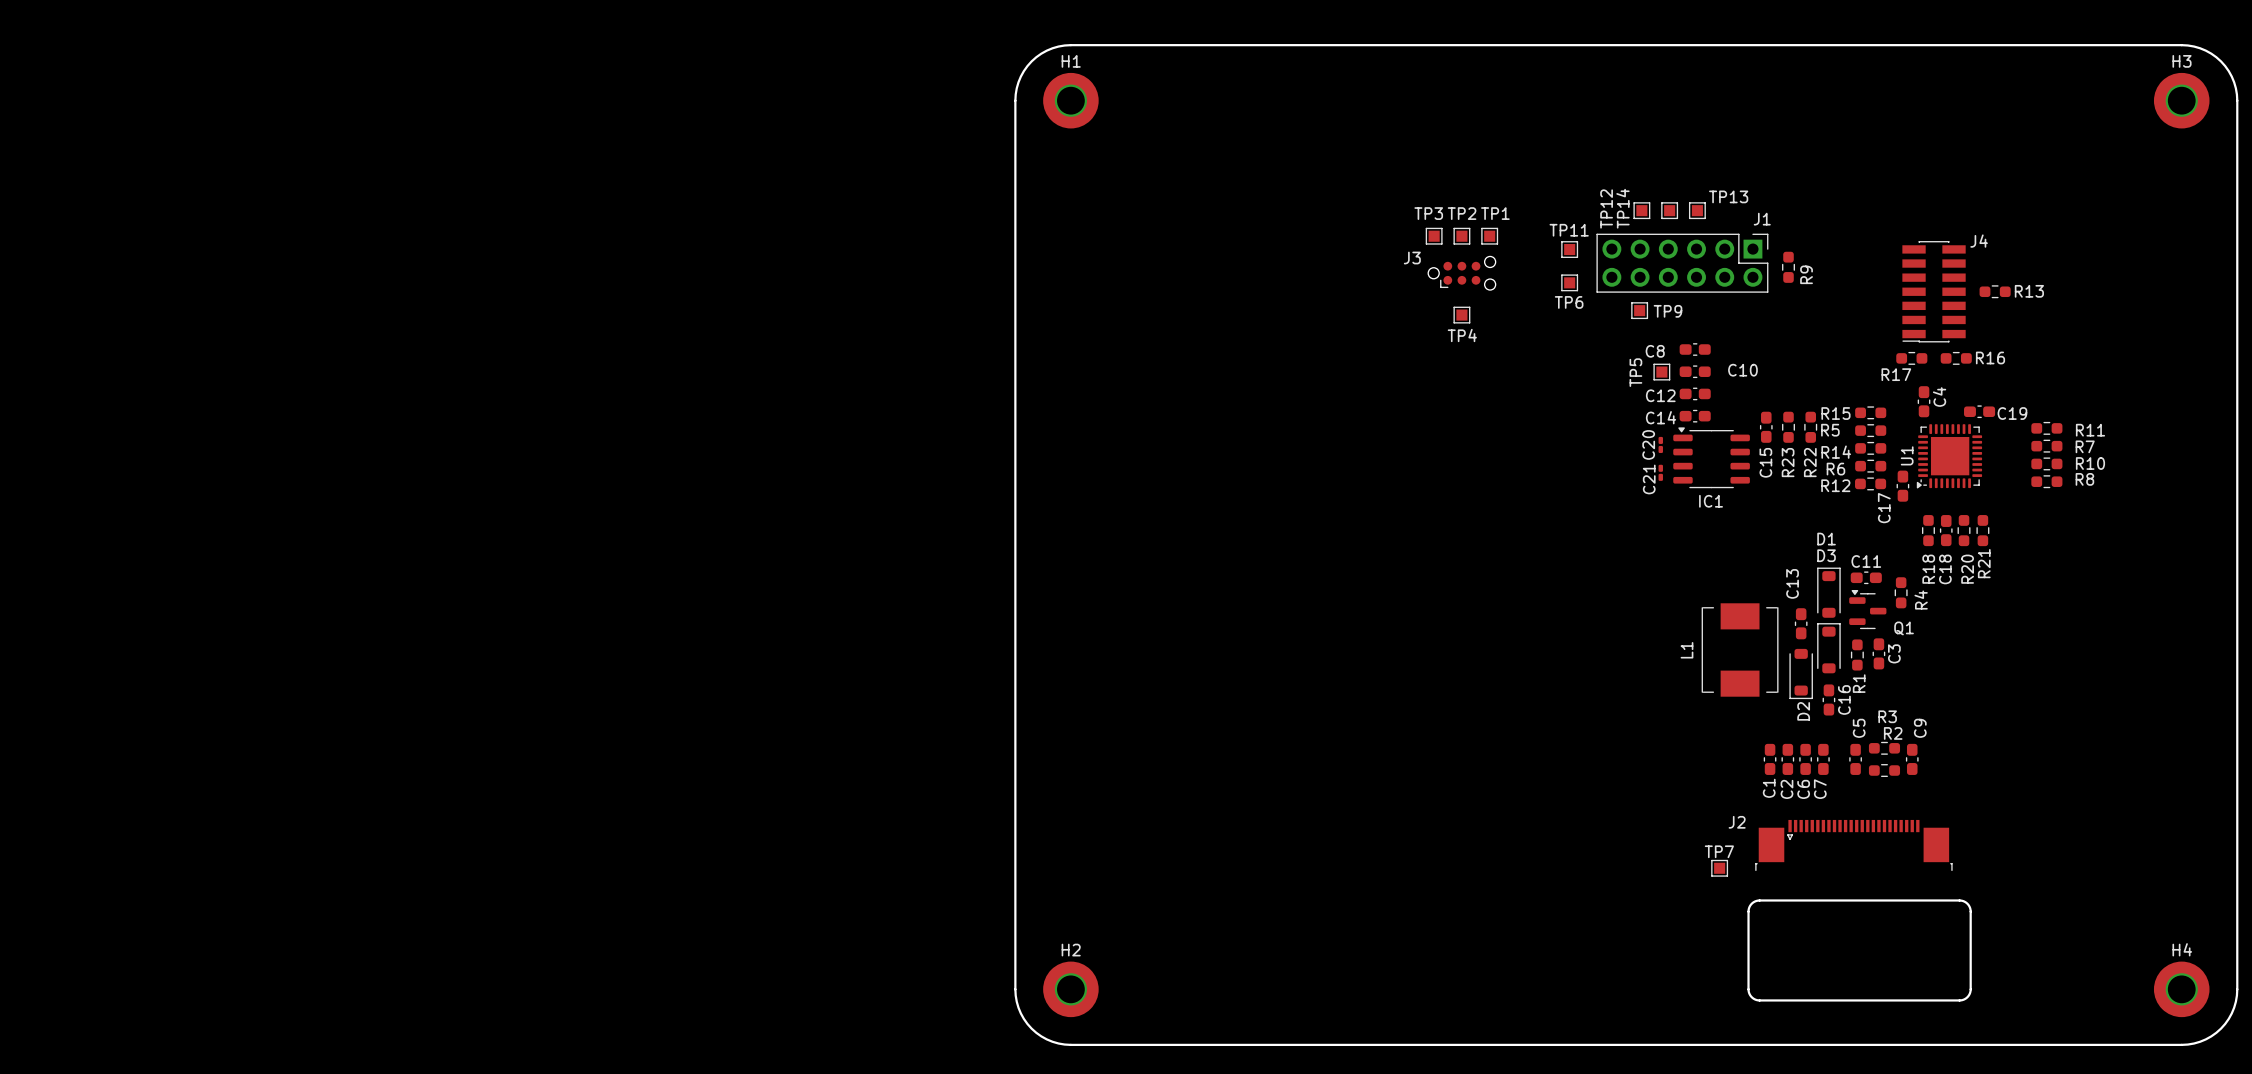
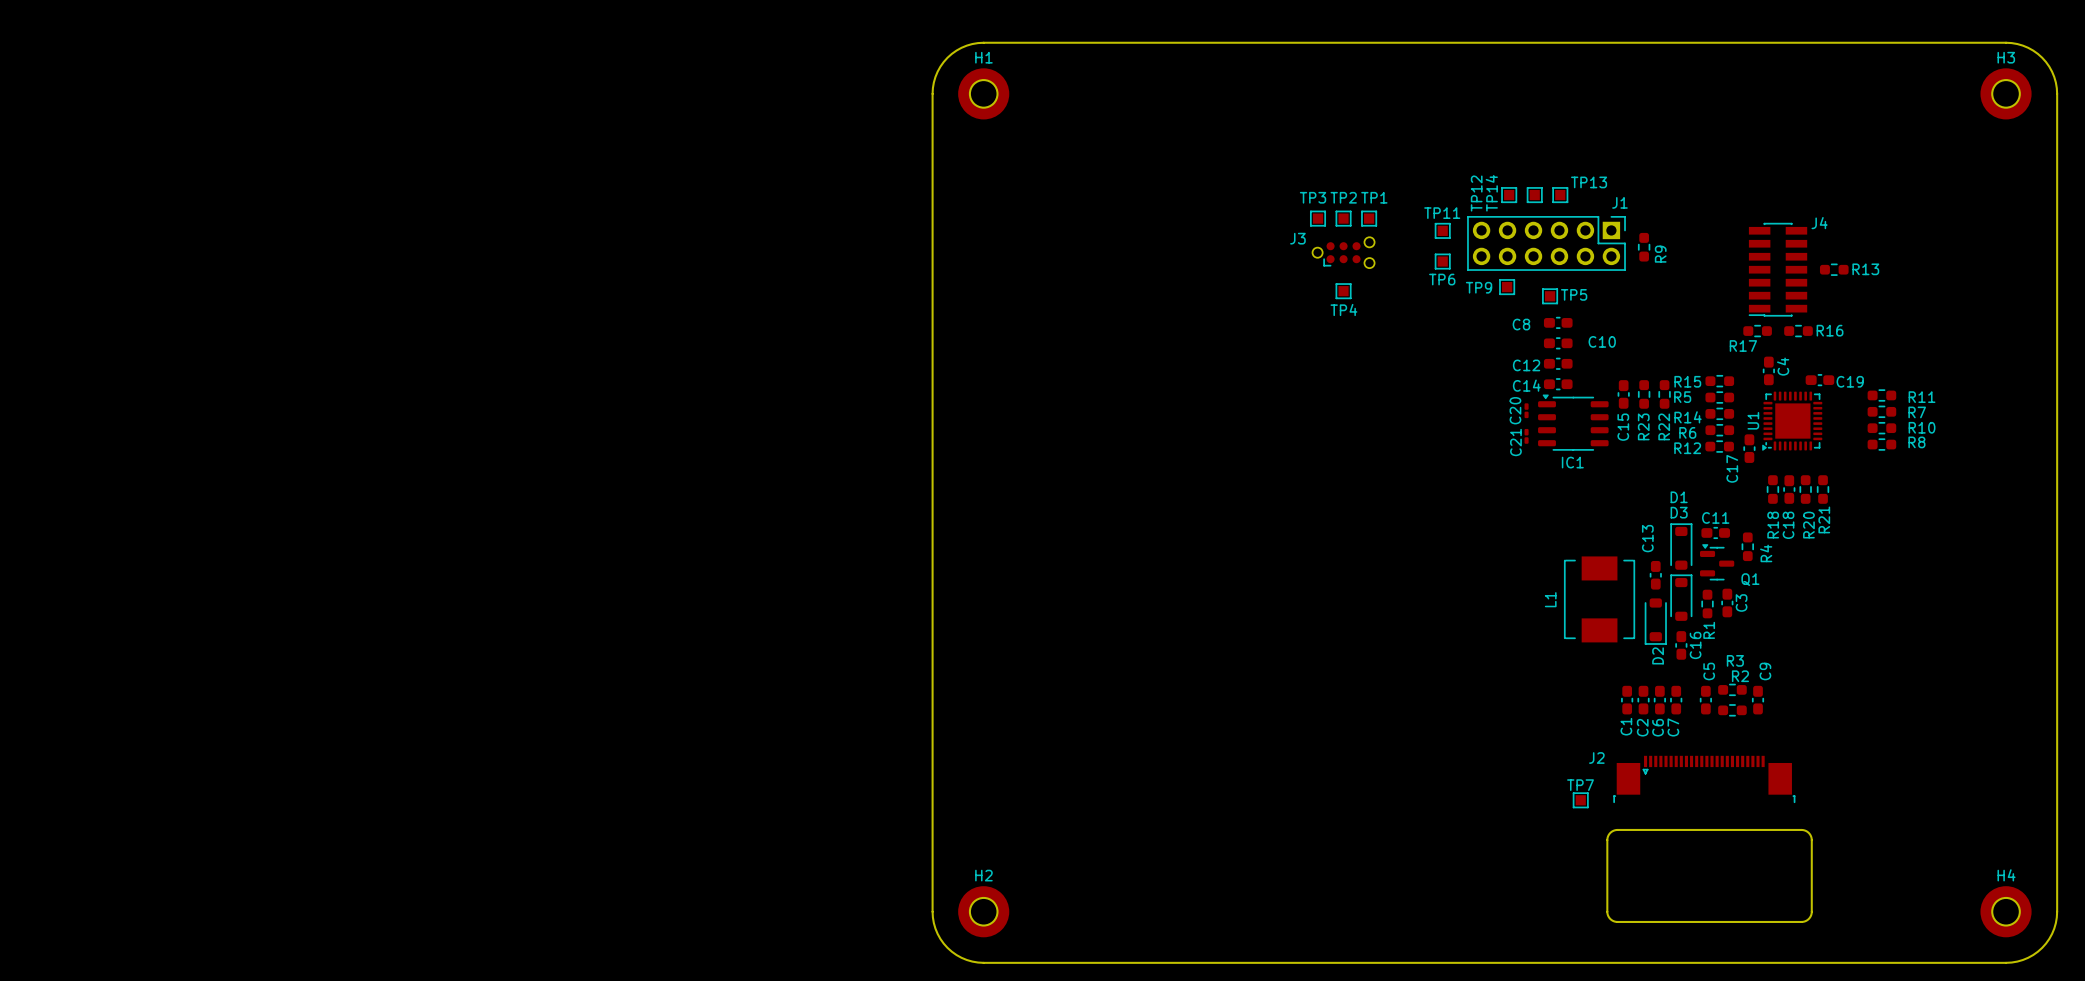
TP9 name position: TP9 (1668, 311) -> TP9 (1479, 287)
TP5 name rotation: 0° (1635, 372) -> 90° clockwise (1574, 294)
TP5 name position: TP5 (1635, 372) -> TP5 (1574, 294)
TP5 position: (1661, 372) -> (1550, 296)

